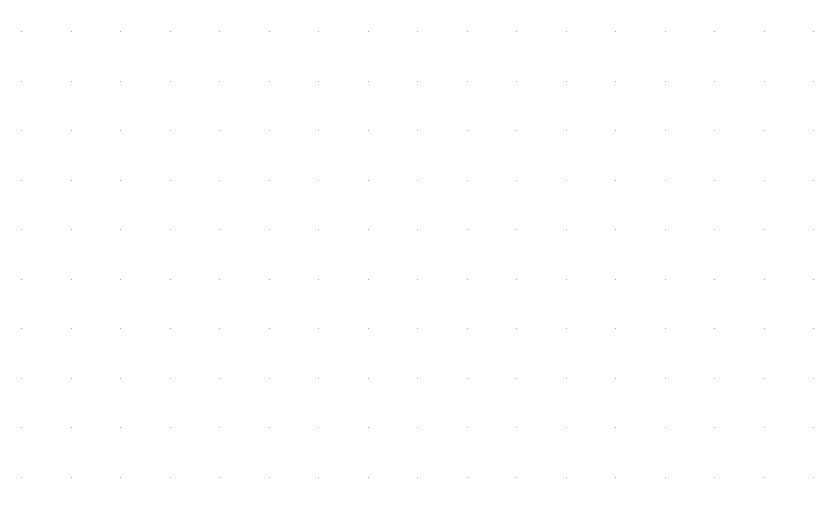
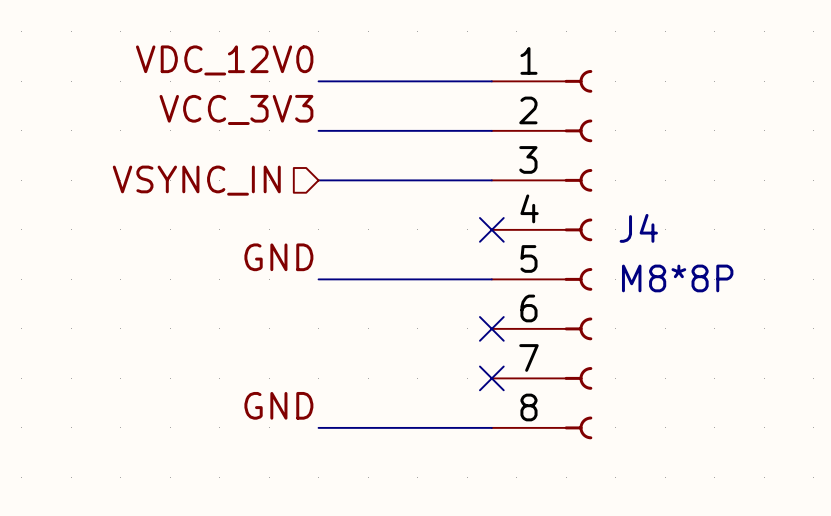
label: none -> VDC_12V0 (224, 60)
wire: none -> (318, 81) (491, 81)
label: none -> VCC_3V3 (236, 109)
wire: none -> (318, 130) (491, 130)
wire: none -> (318, 180) (491, 180)
hierarchical label: none -> VSYNC_IN (196, 180)
no-connect mark: none -> (491, 229)
J4: none -> M8*8P (542, 254)
label: none -> GND (278, 257)
wire: none -> (318, 279) (491, 279)
no-connect mark: none -> (491, 328)
no-connect mark: none -> (491, 378)
label: none -> GND (278, 405)
wire: none -> (318, 427) (491, 427)

